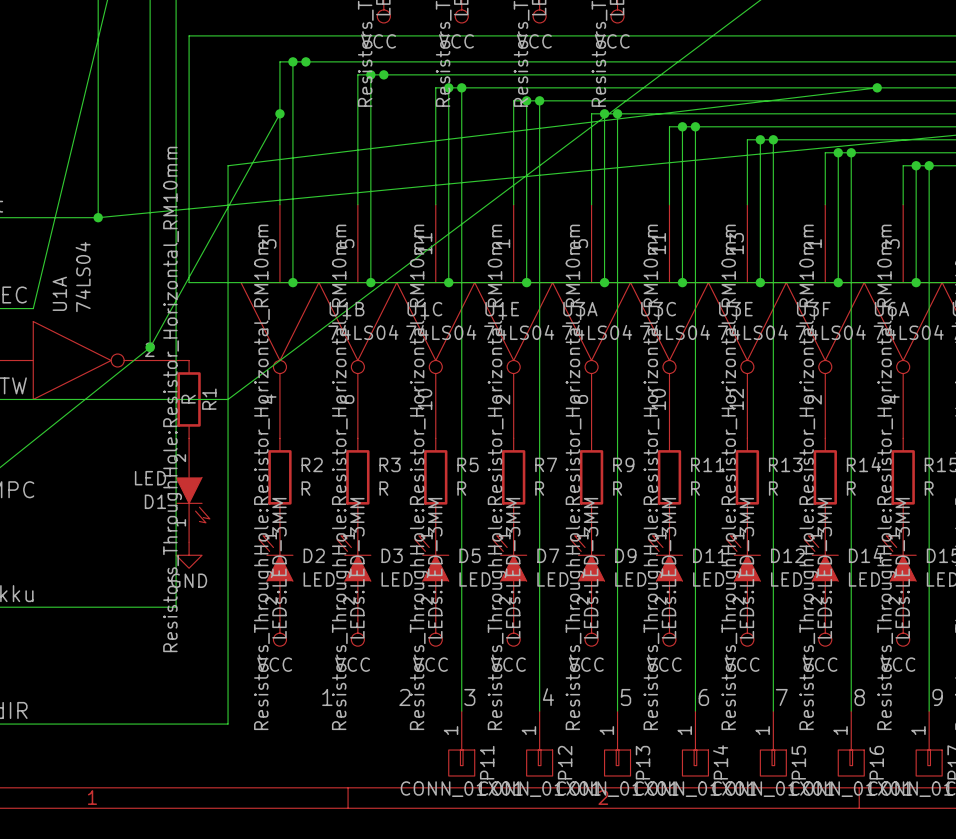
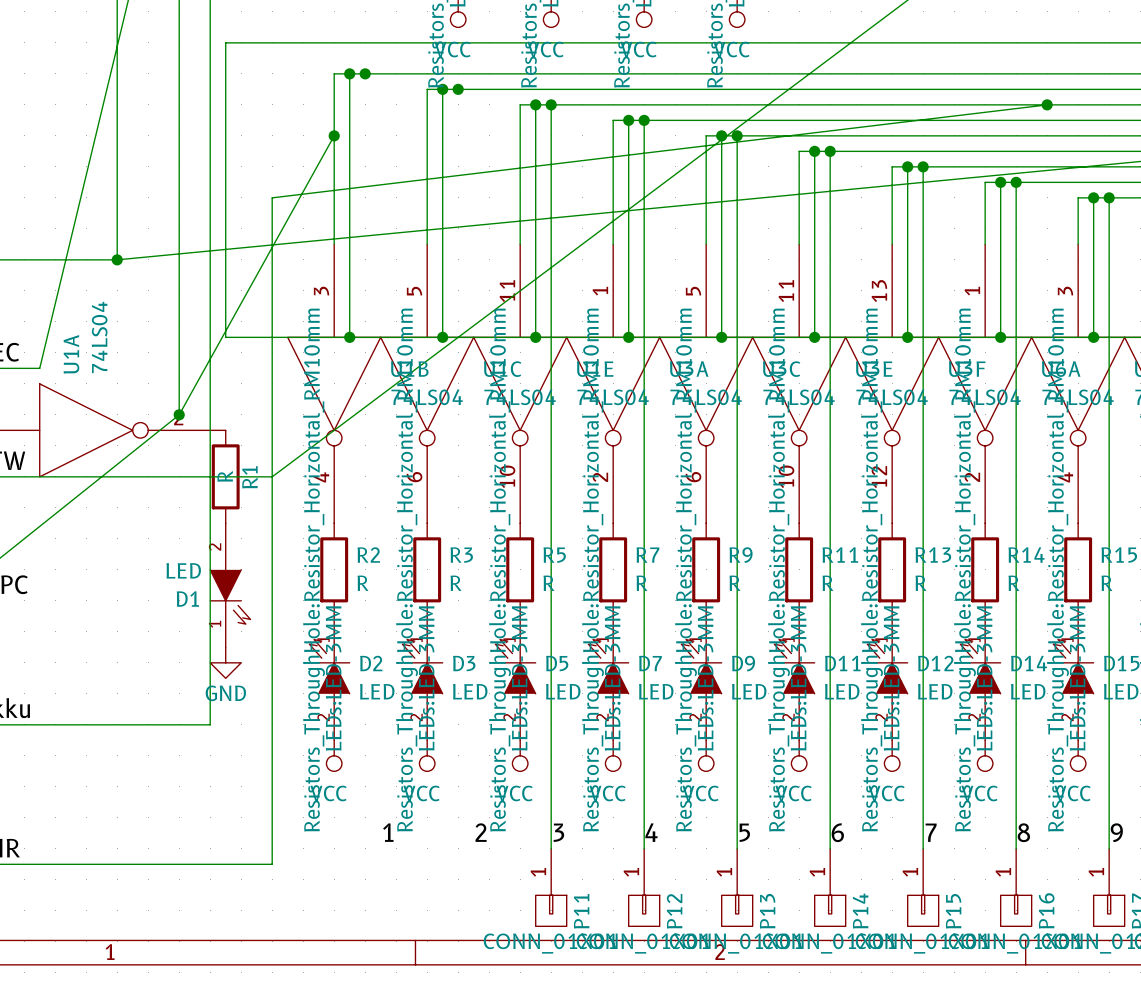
R1 text: Resistors_ThroughHole:Resistor_Horizontal_RM10mm (172, 399) -> none

